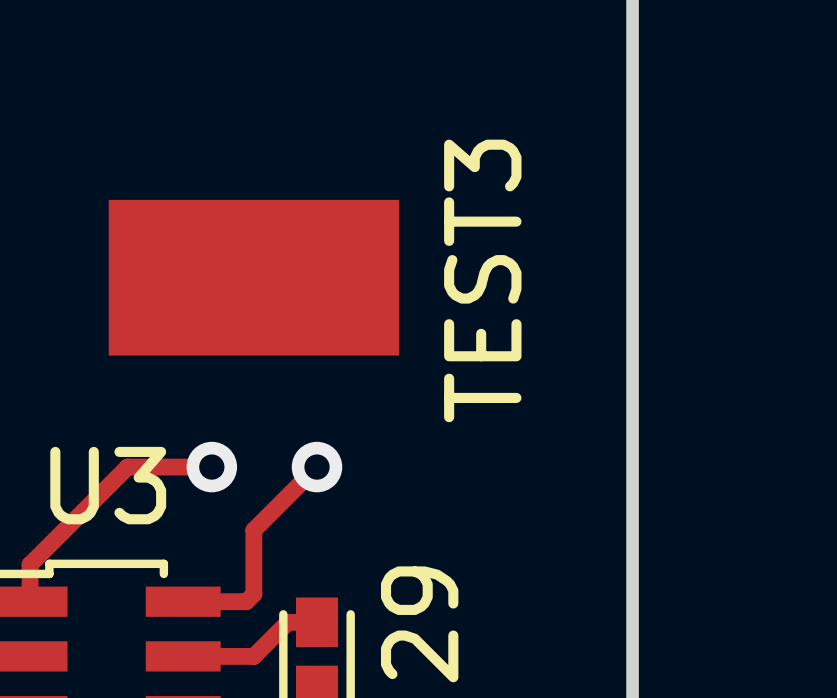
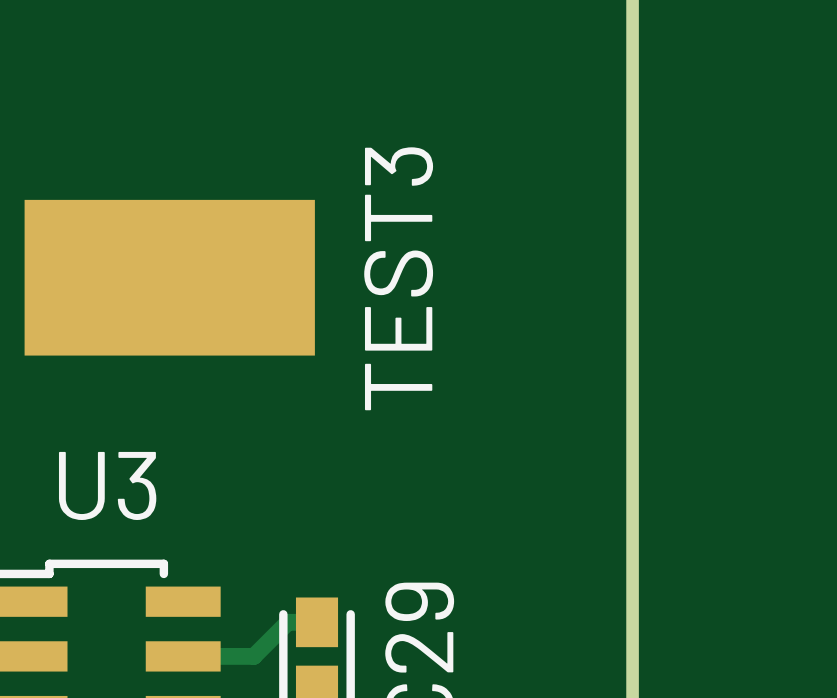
TEST3 position: (253, 277) -> (169, 277)
track: (211, 467) (127, 467) (30, 564) (30, 601) -> none
via: (211, 467) -> none
track: (317, 467) (253, 530) (253, 594) (246, 601) (183, 601) -> none
via: (317, 467) -> none

